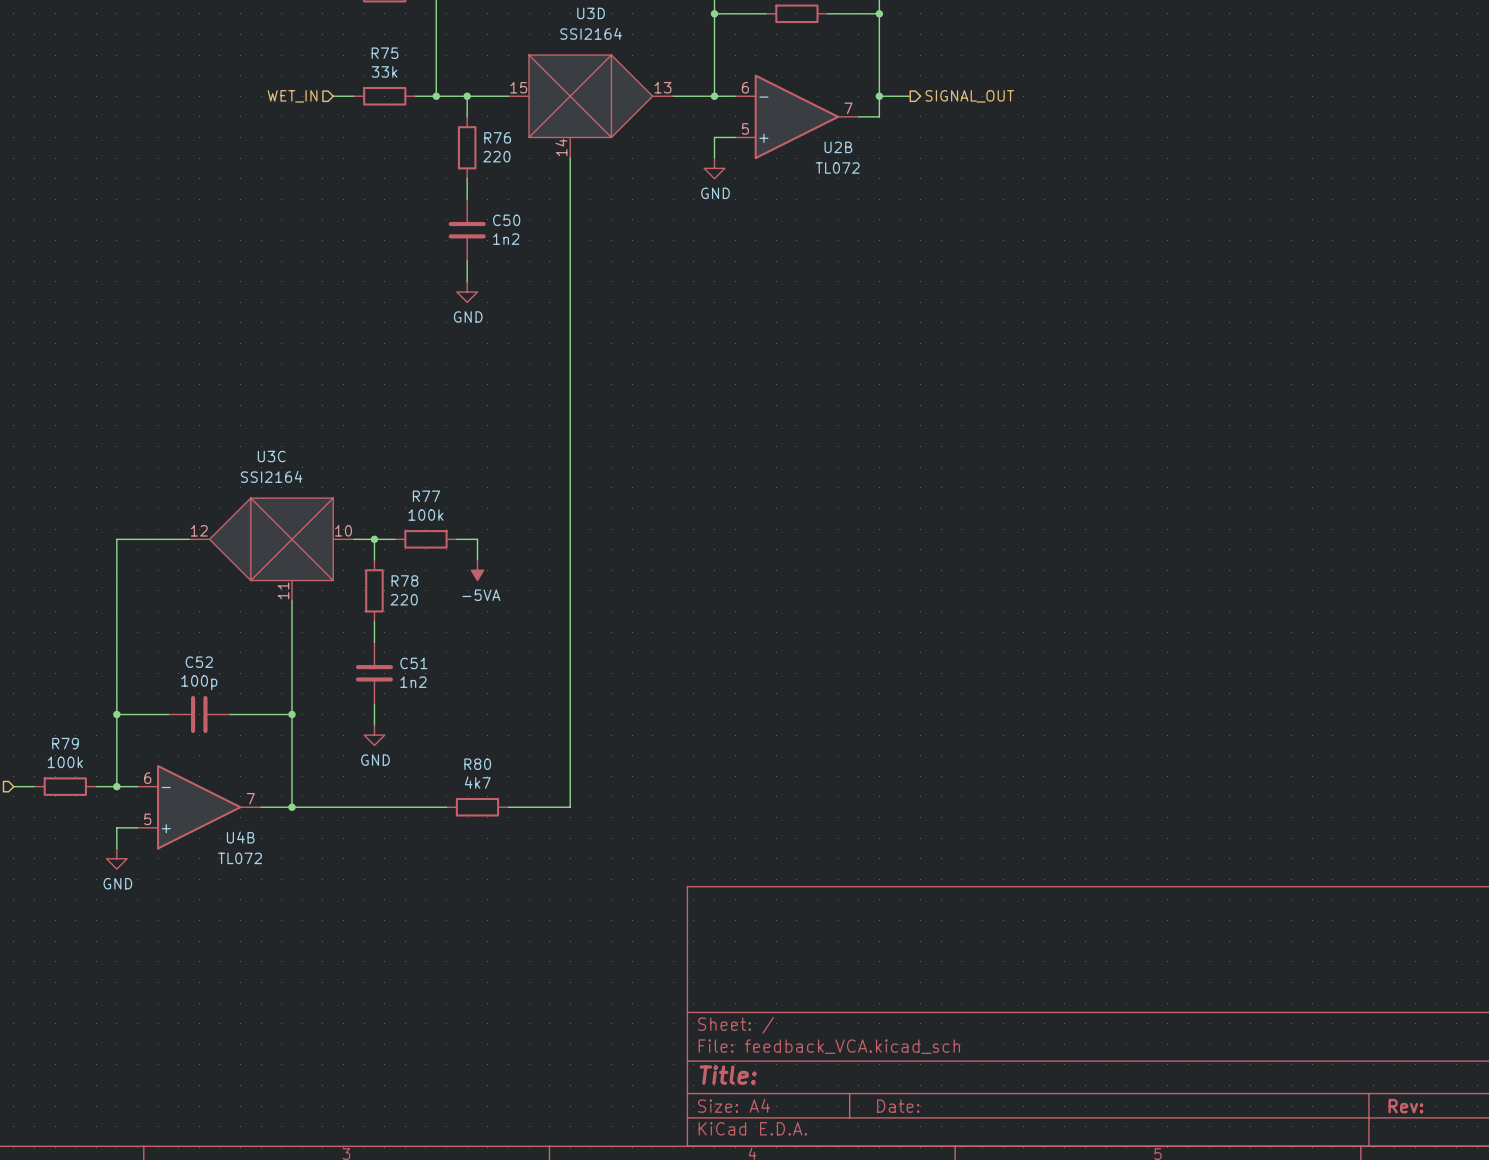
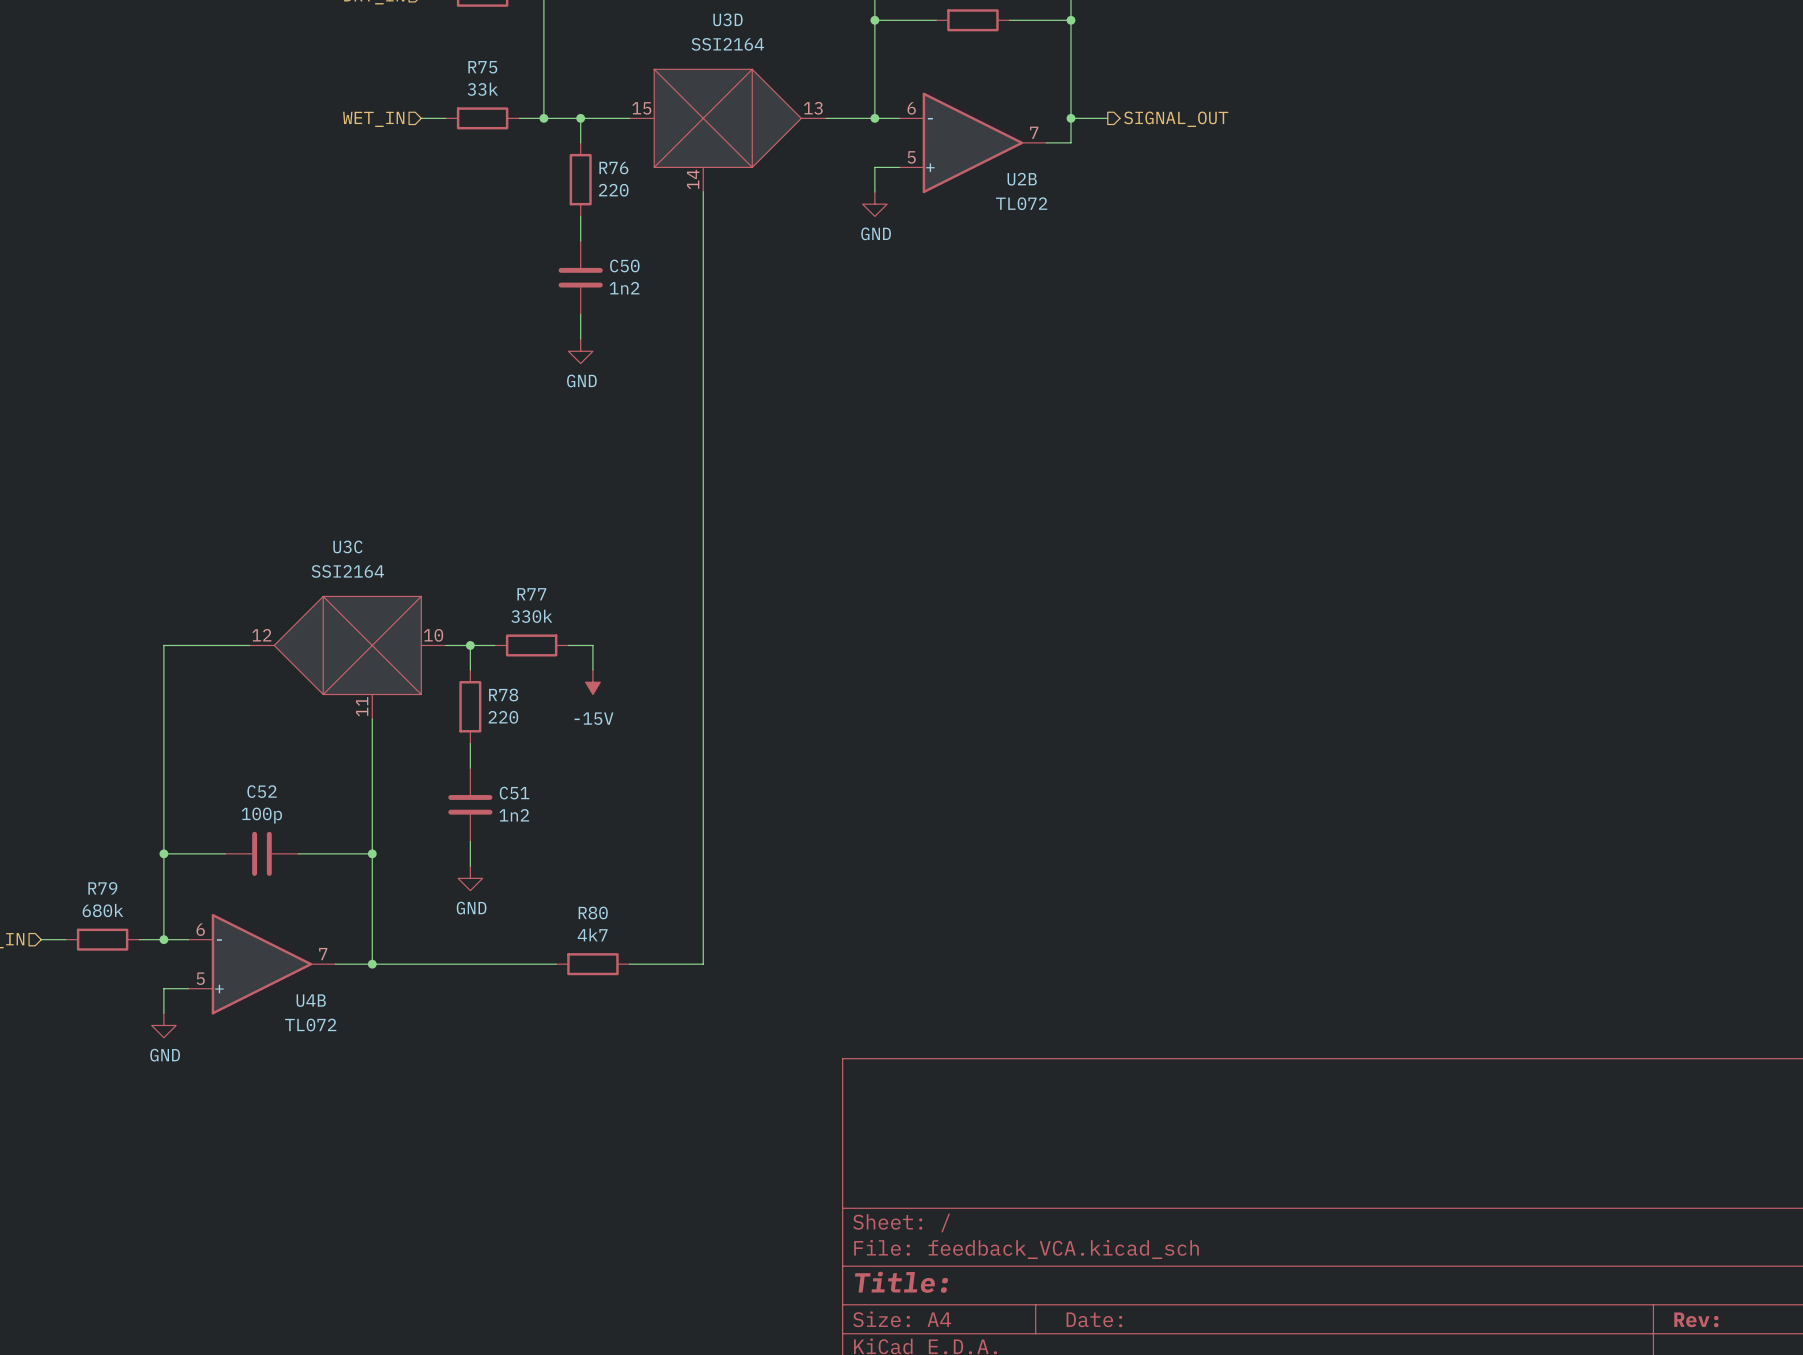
R77 value: 100k (425, 515) -> 330k (531, 616)
power symbol: -5VA (477, 570) -> -15V (592, 682)
R79 value: 100k (65, 762) -> 680k (102, 910)

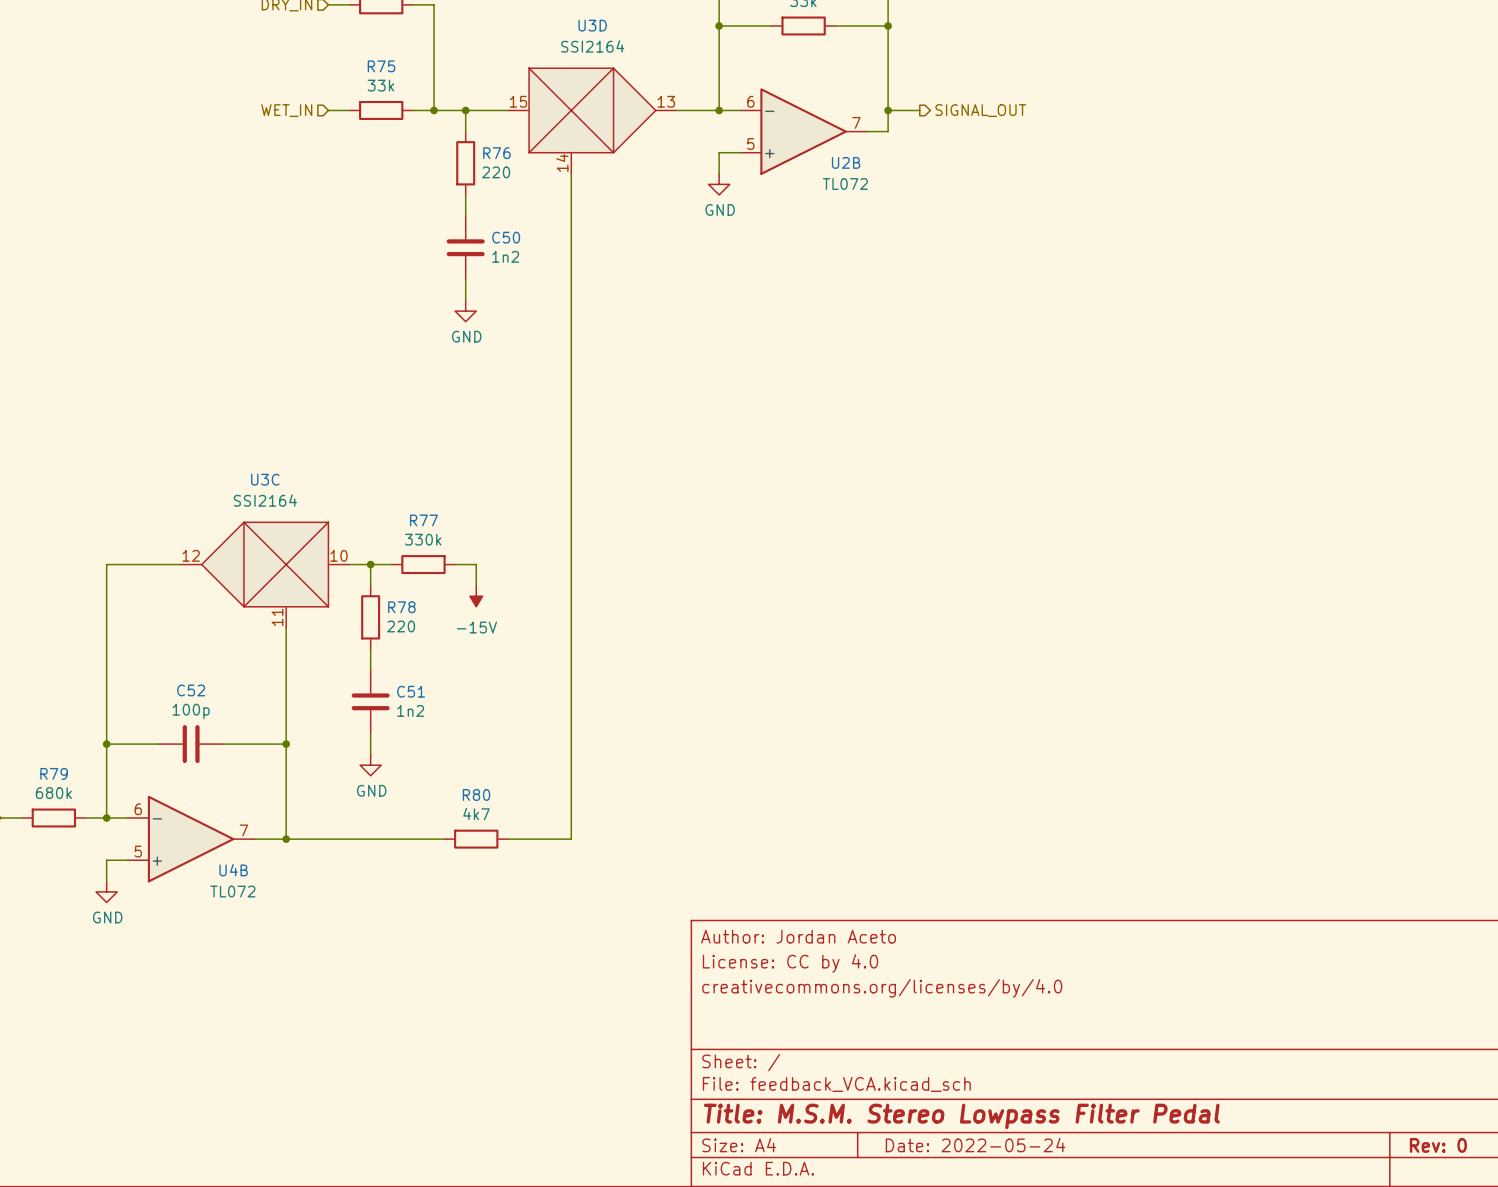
title block: none -> Author: Jordan Aceto (798, 936)
title block: none -> License: CC by 4.0 (790, 963)
title block: none -> creativecommons.org/licenses/by/4.0 (882, 988)
title block: Title: (901, 1282) -> Title: M.S.M. Stereo Lowpass Filter Pedal (961, 1116)
title block: Date: (1094, 1319) -> Date: 2022-05-24 (975, 1145)
title block: Rev: (1696, 1319) -> Rev: 0 (1438, 1145)

